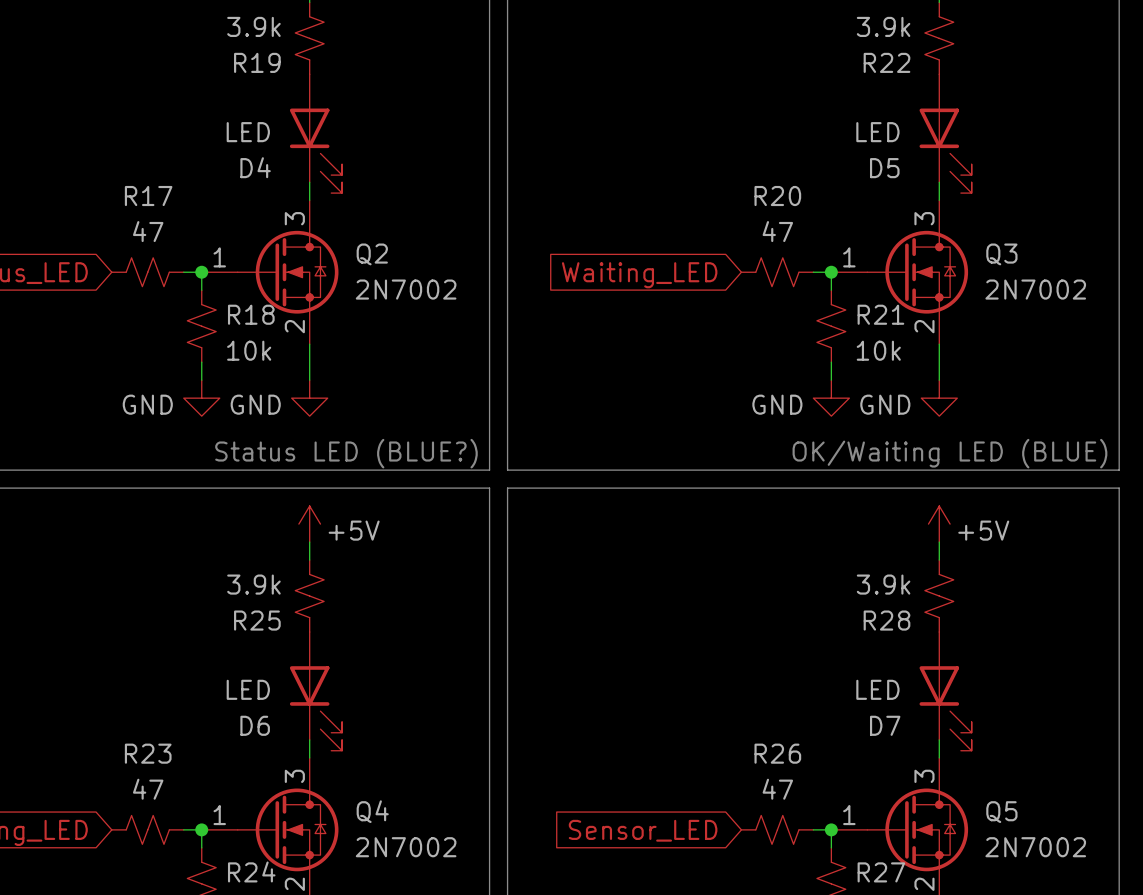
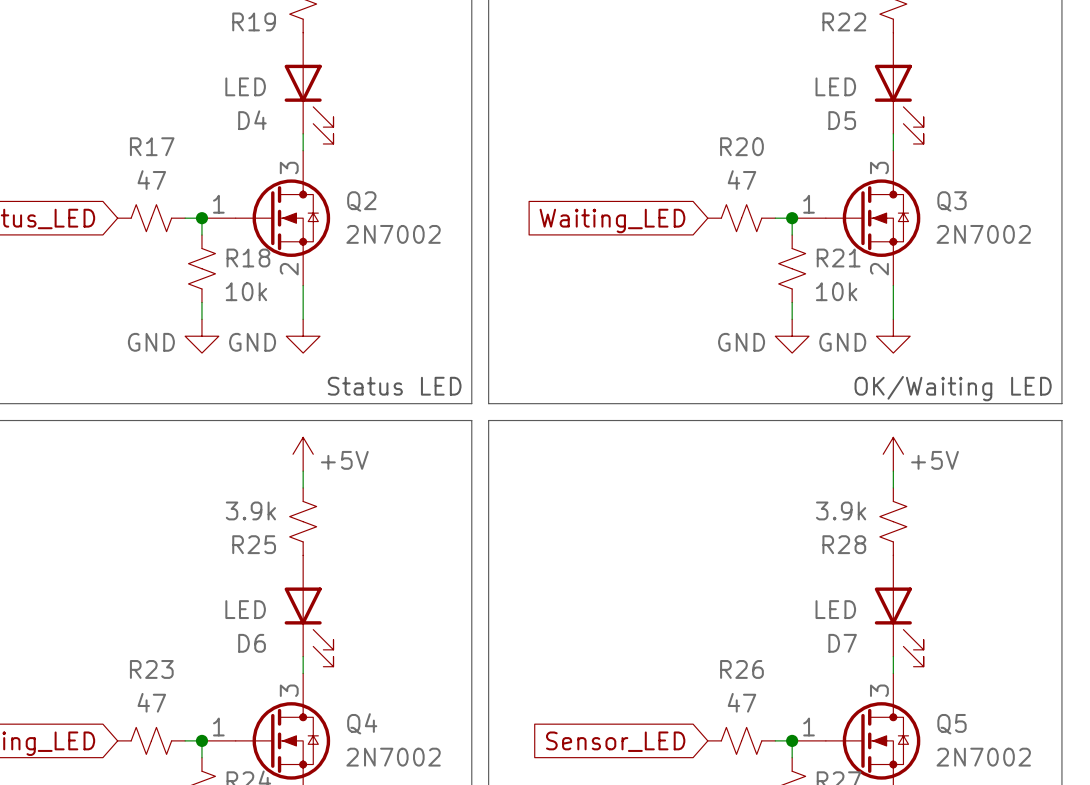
text: Status LED (BLUE?) (346, 453) -> Status LED (394, 386)
text: OK/Waiting LED (BLUE) (949, 453) -> OK/Waiting LED (953, 388)

